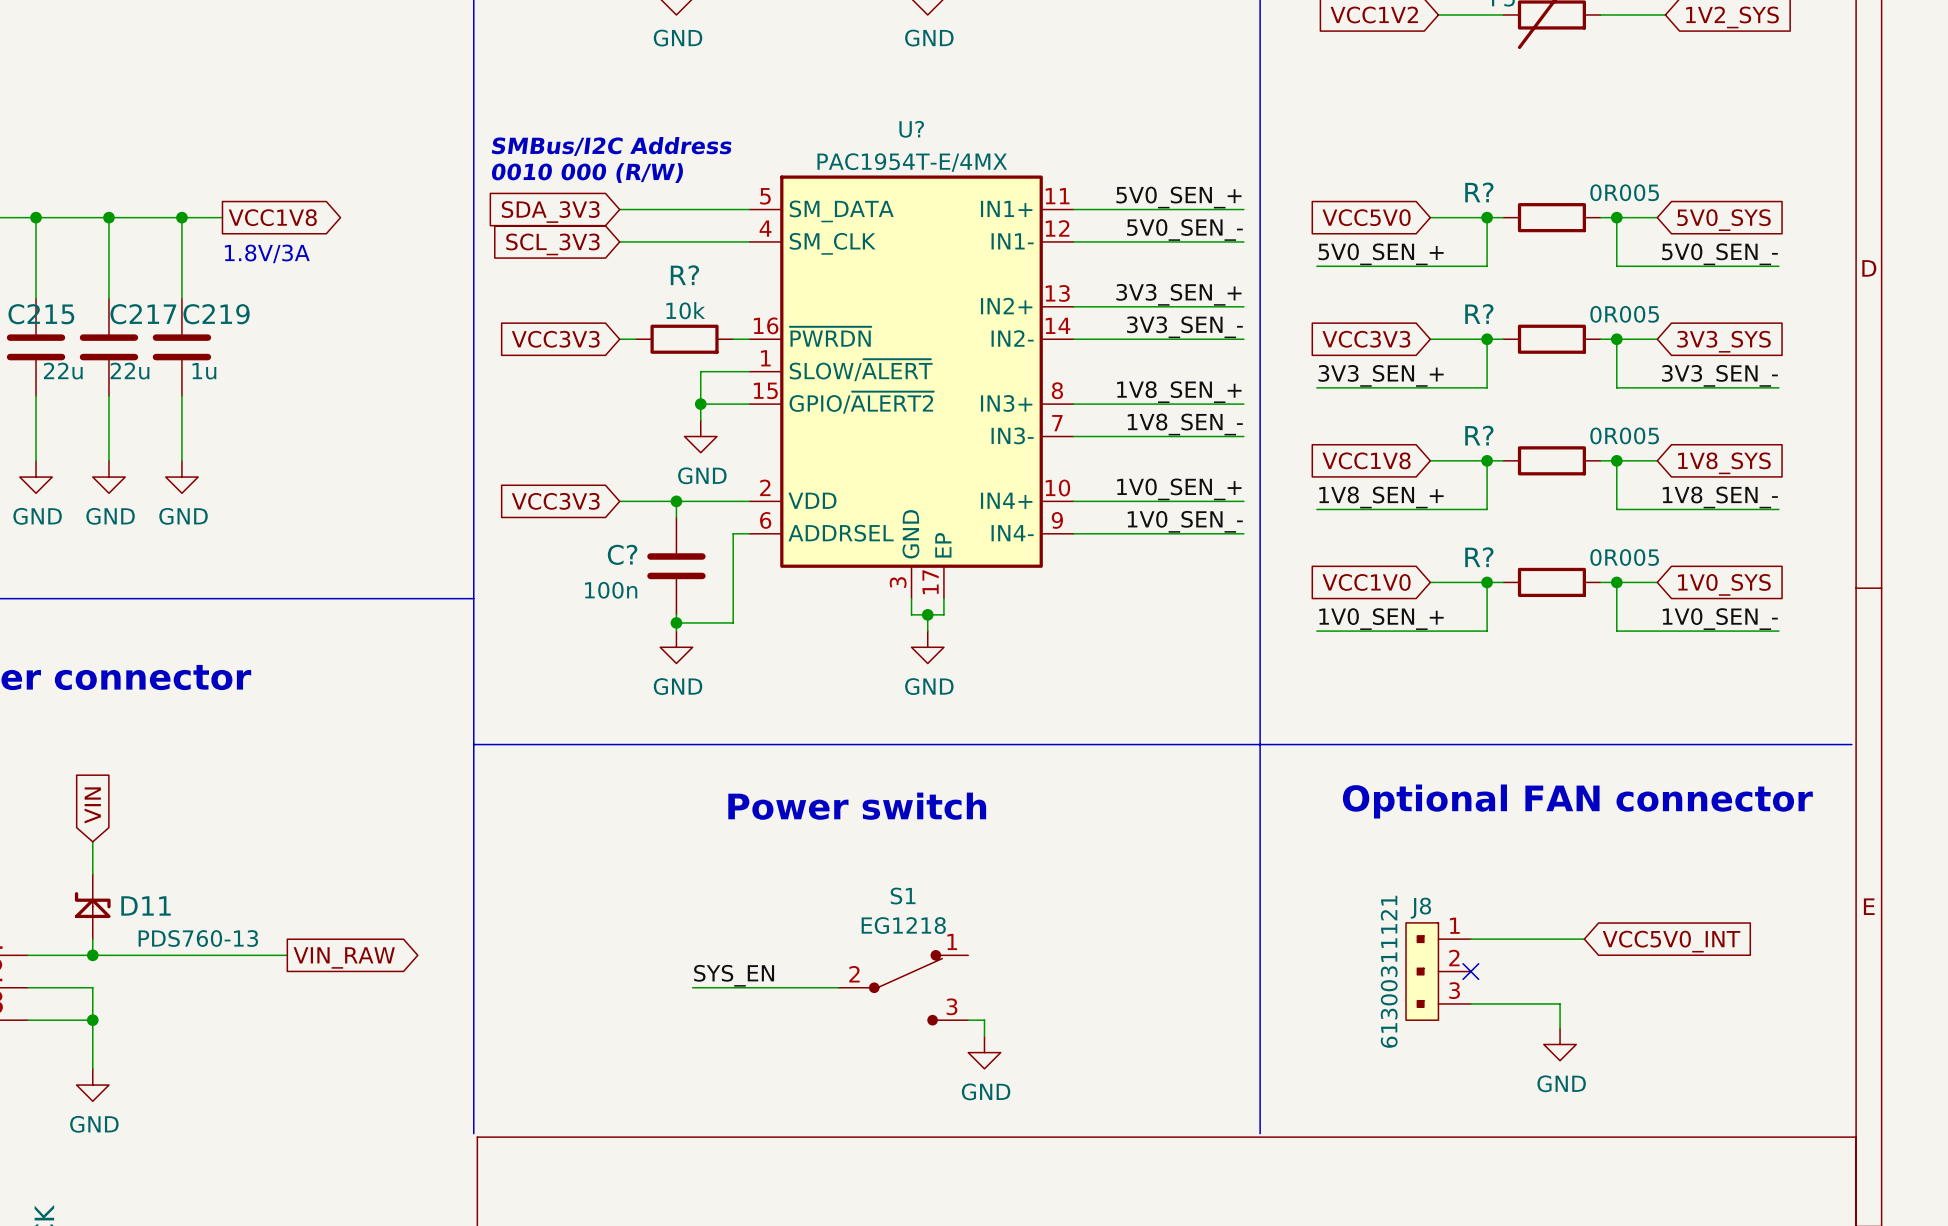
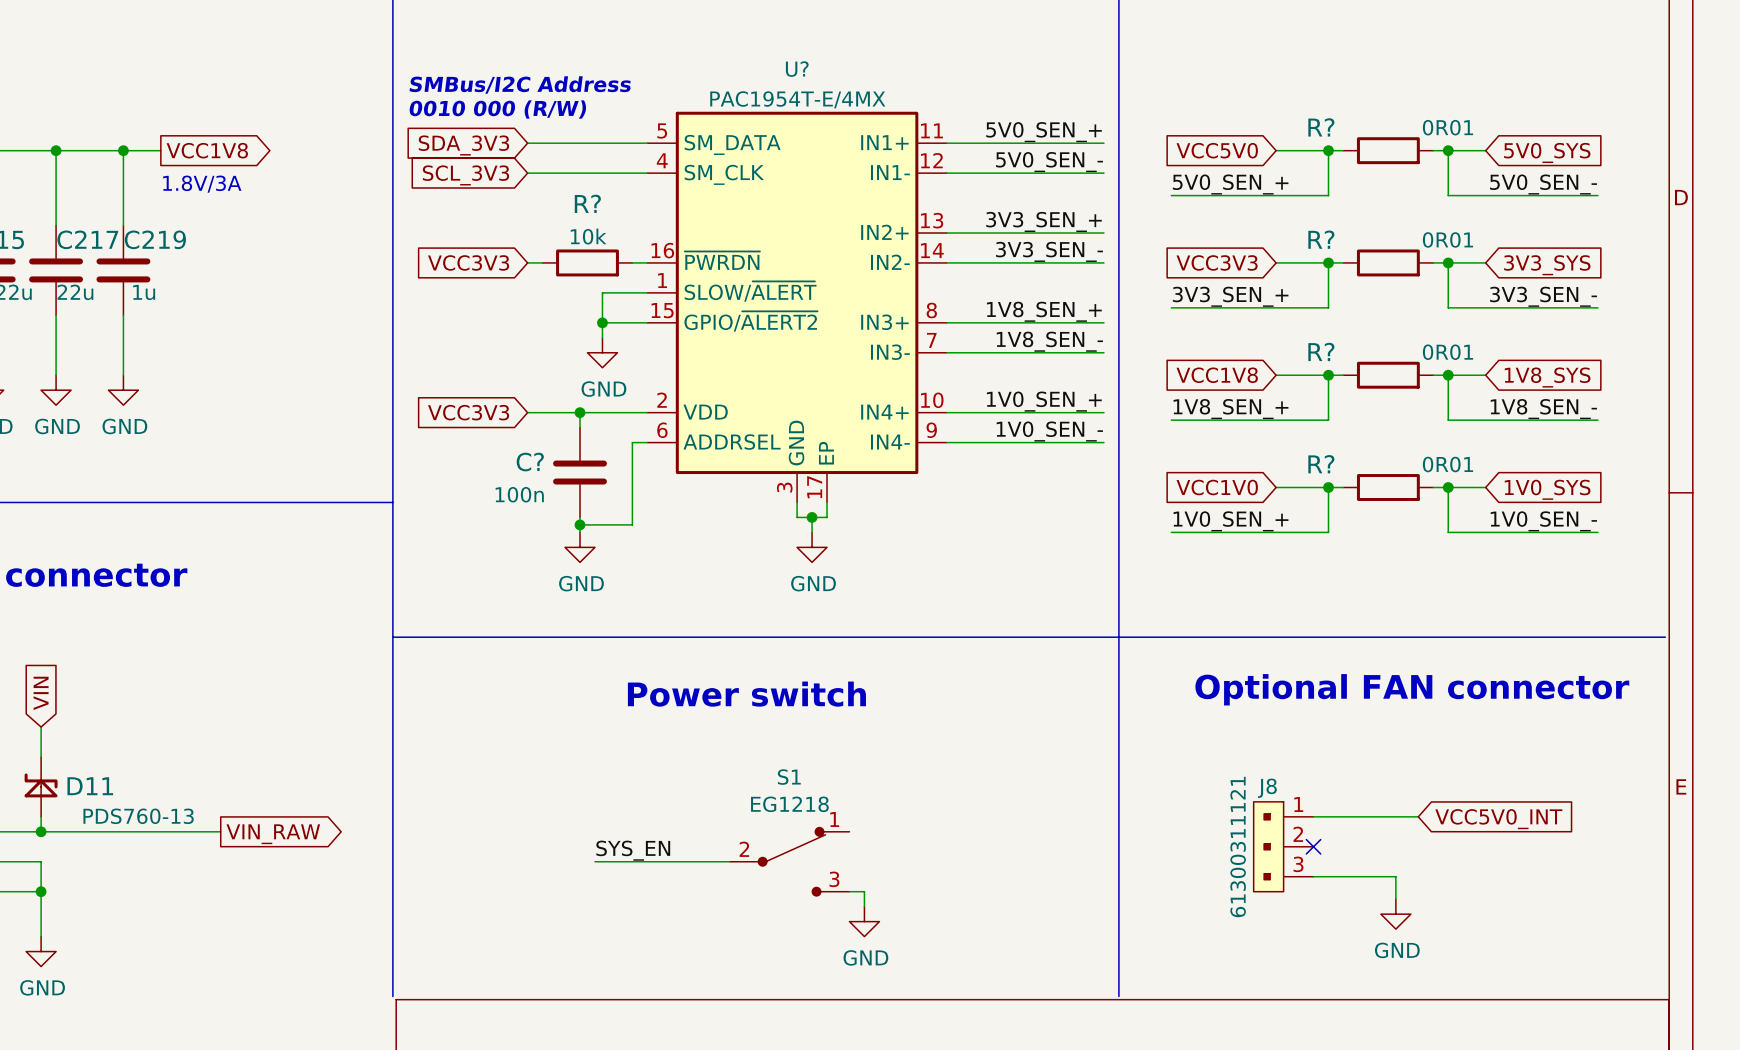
R? text: 0R005 (1624, 192) -> 0R01 (1448, 127)
R? text: 0R005 (1624, 314) -> 0R01 (1448, 239)
R? text: 0R005 (1624, 435) -> 0R01 (1448, 352)
R? text: 0R005 (1624, 557) -> 0R01 (1448, 464)

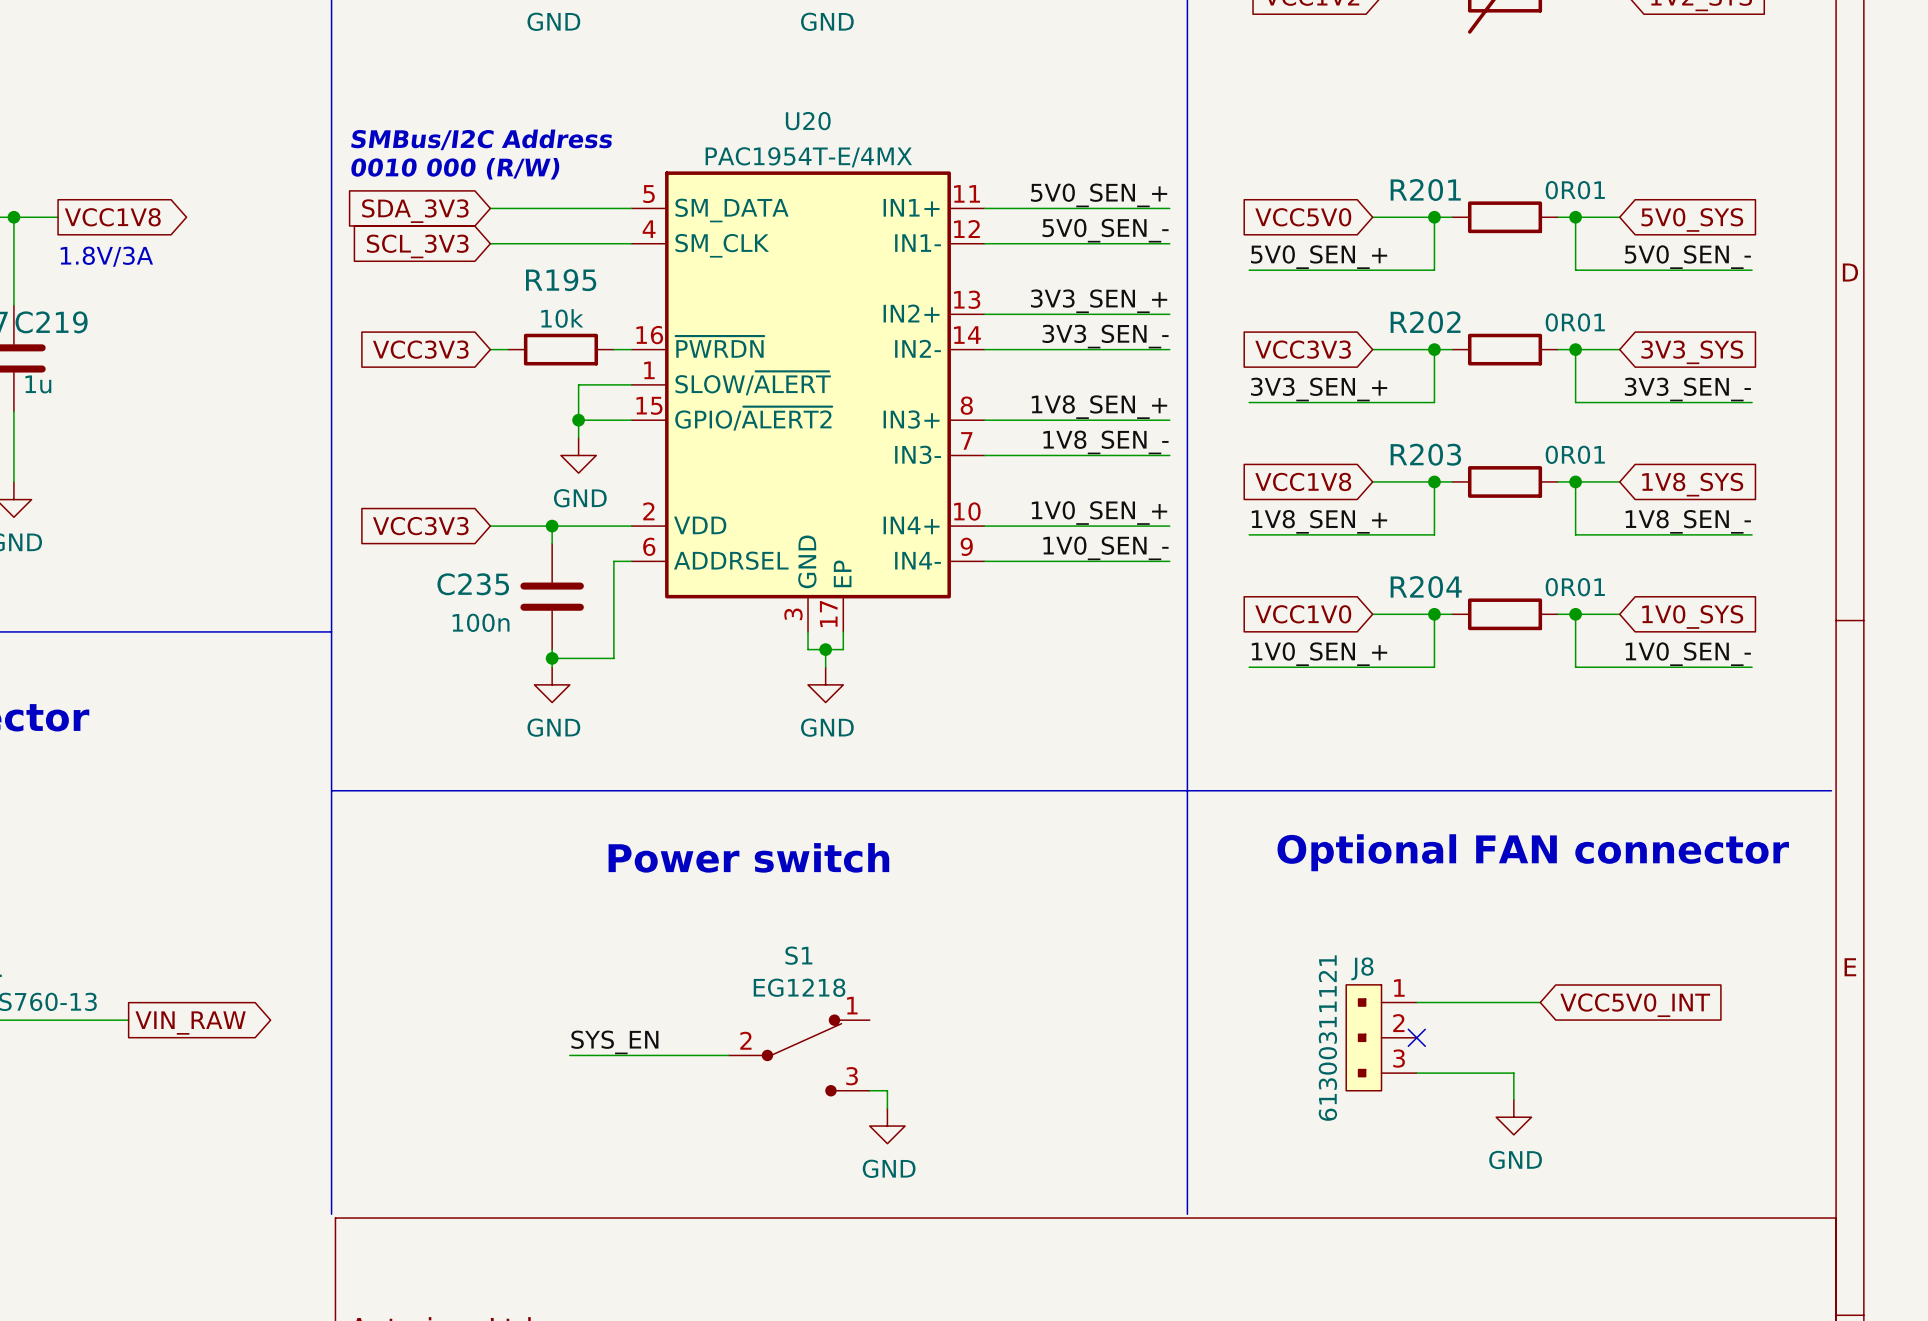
U? name: U? (797, 69) -> U20 (808, 121)
R? name: R? (1321, 127) -> R201 (1425, 190)
R? name: R? (587, 203) -> R195 (561, 280)
R? name: R? (1321, 239) -> R202 (1425, 322)
R? name: R? (1321, 351) -> R203 (1425, 454)
C? name: C? (530, 462) -> C235 (473, 584)
R? name: R? (1321, 464) -> R204 (1426, 587)

